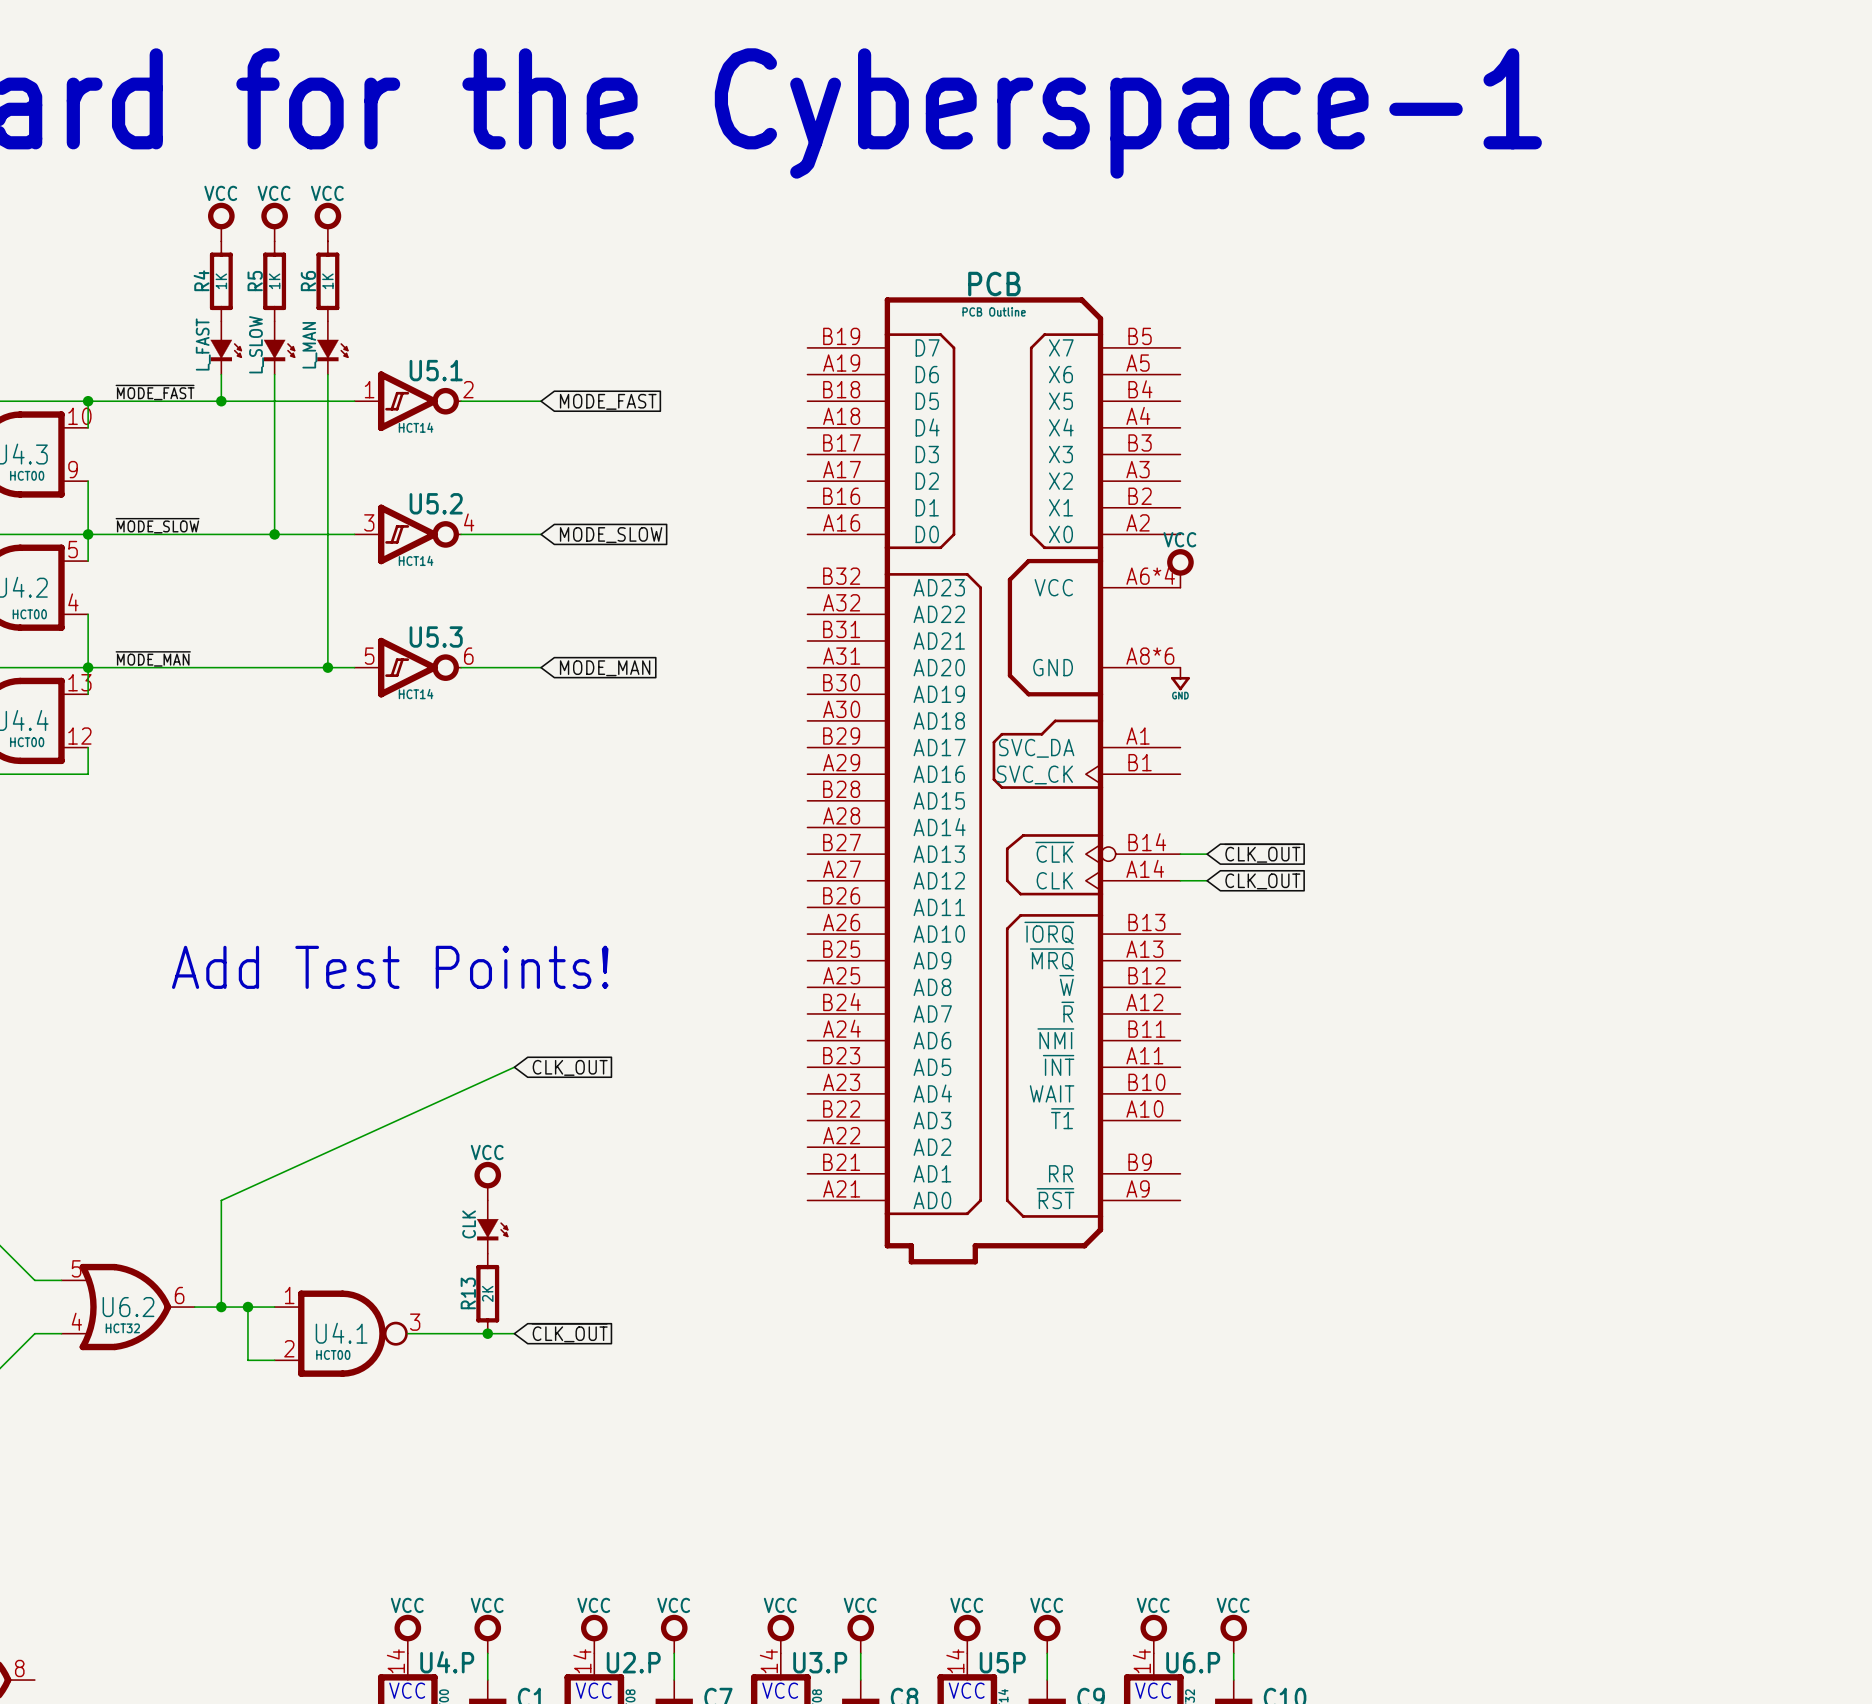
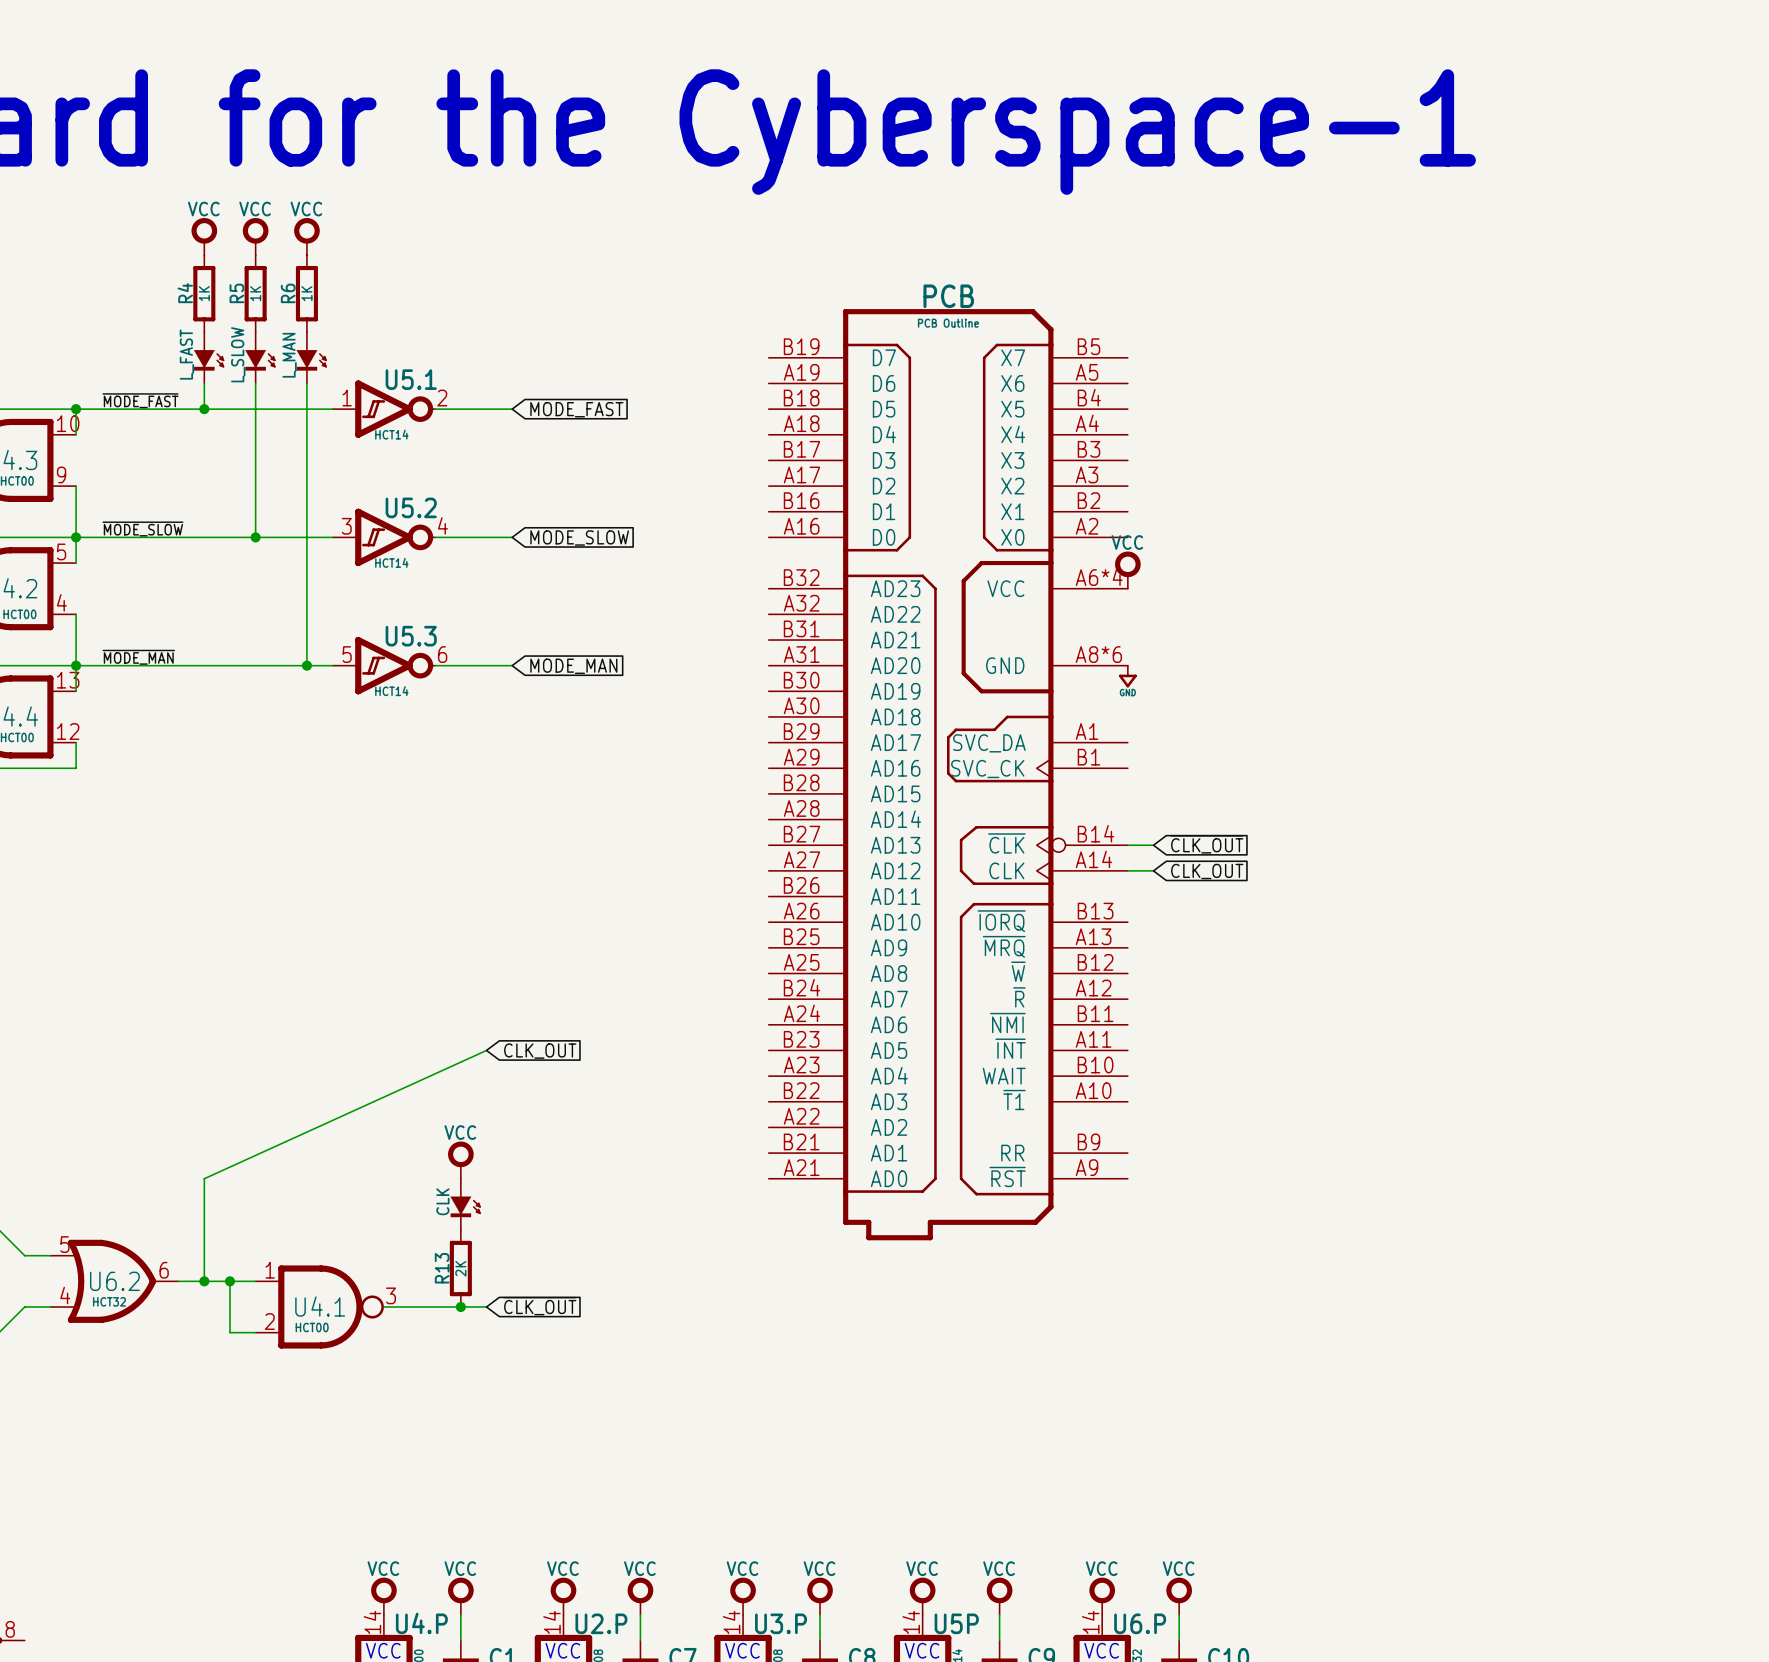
text: Add Test Points! (390, 967) -> none

